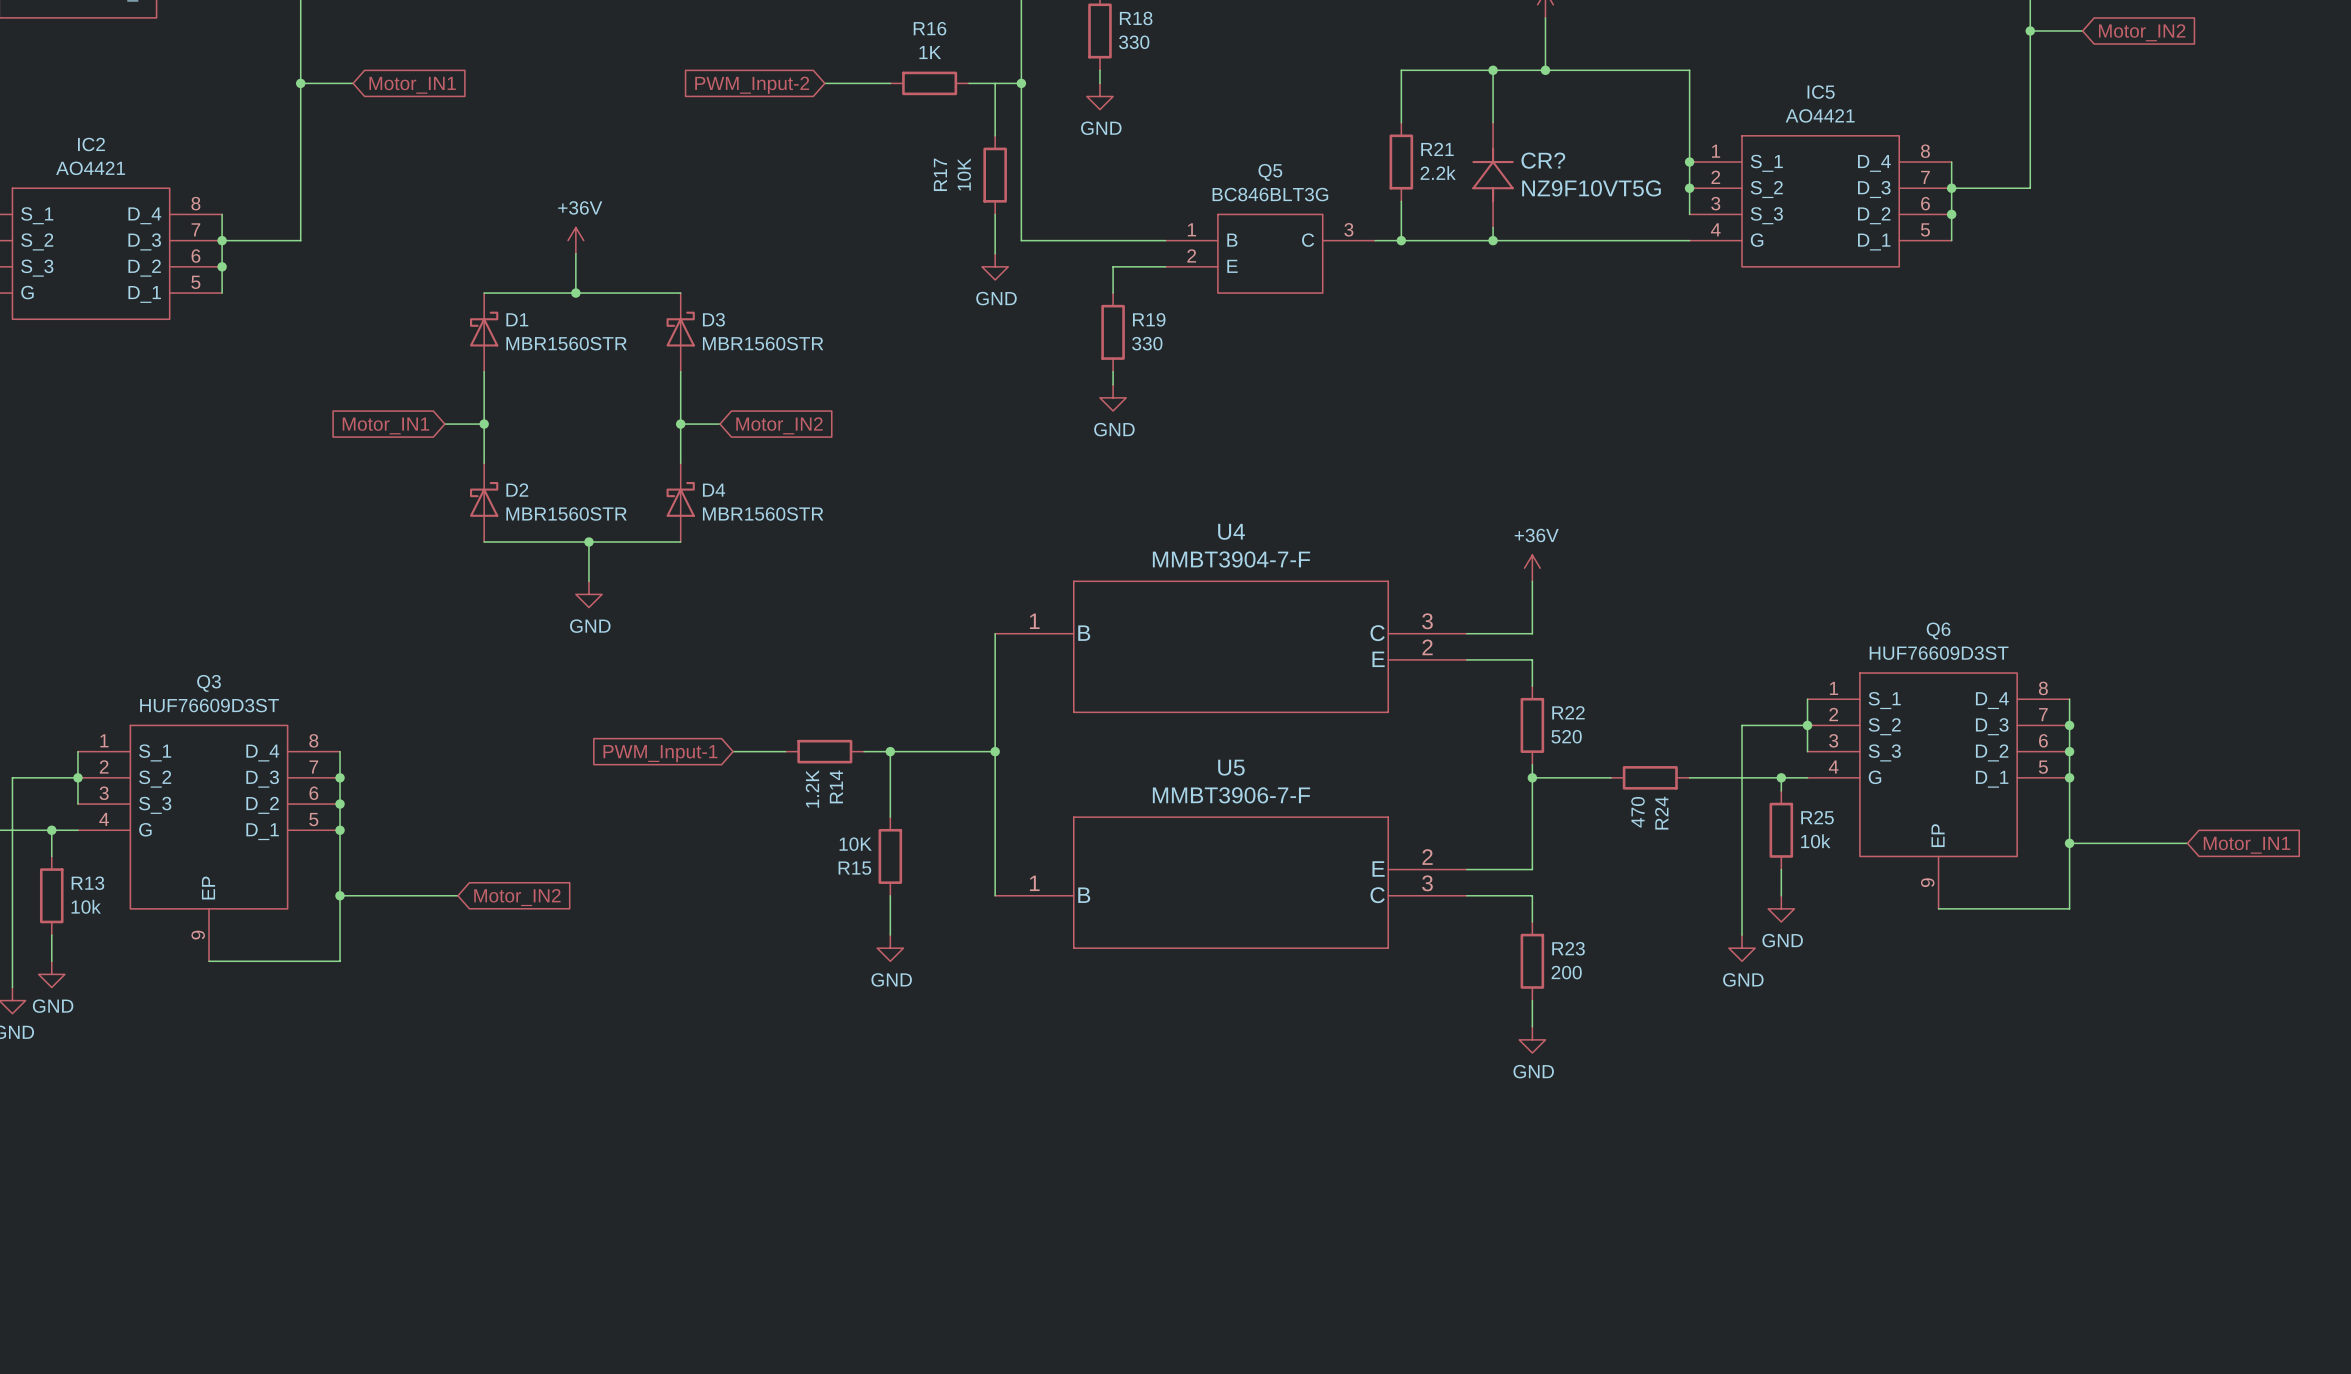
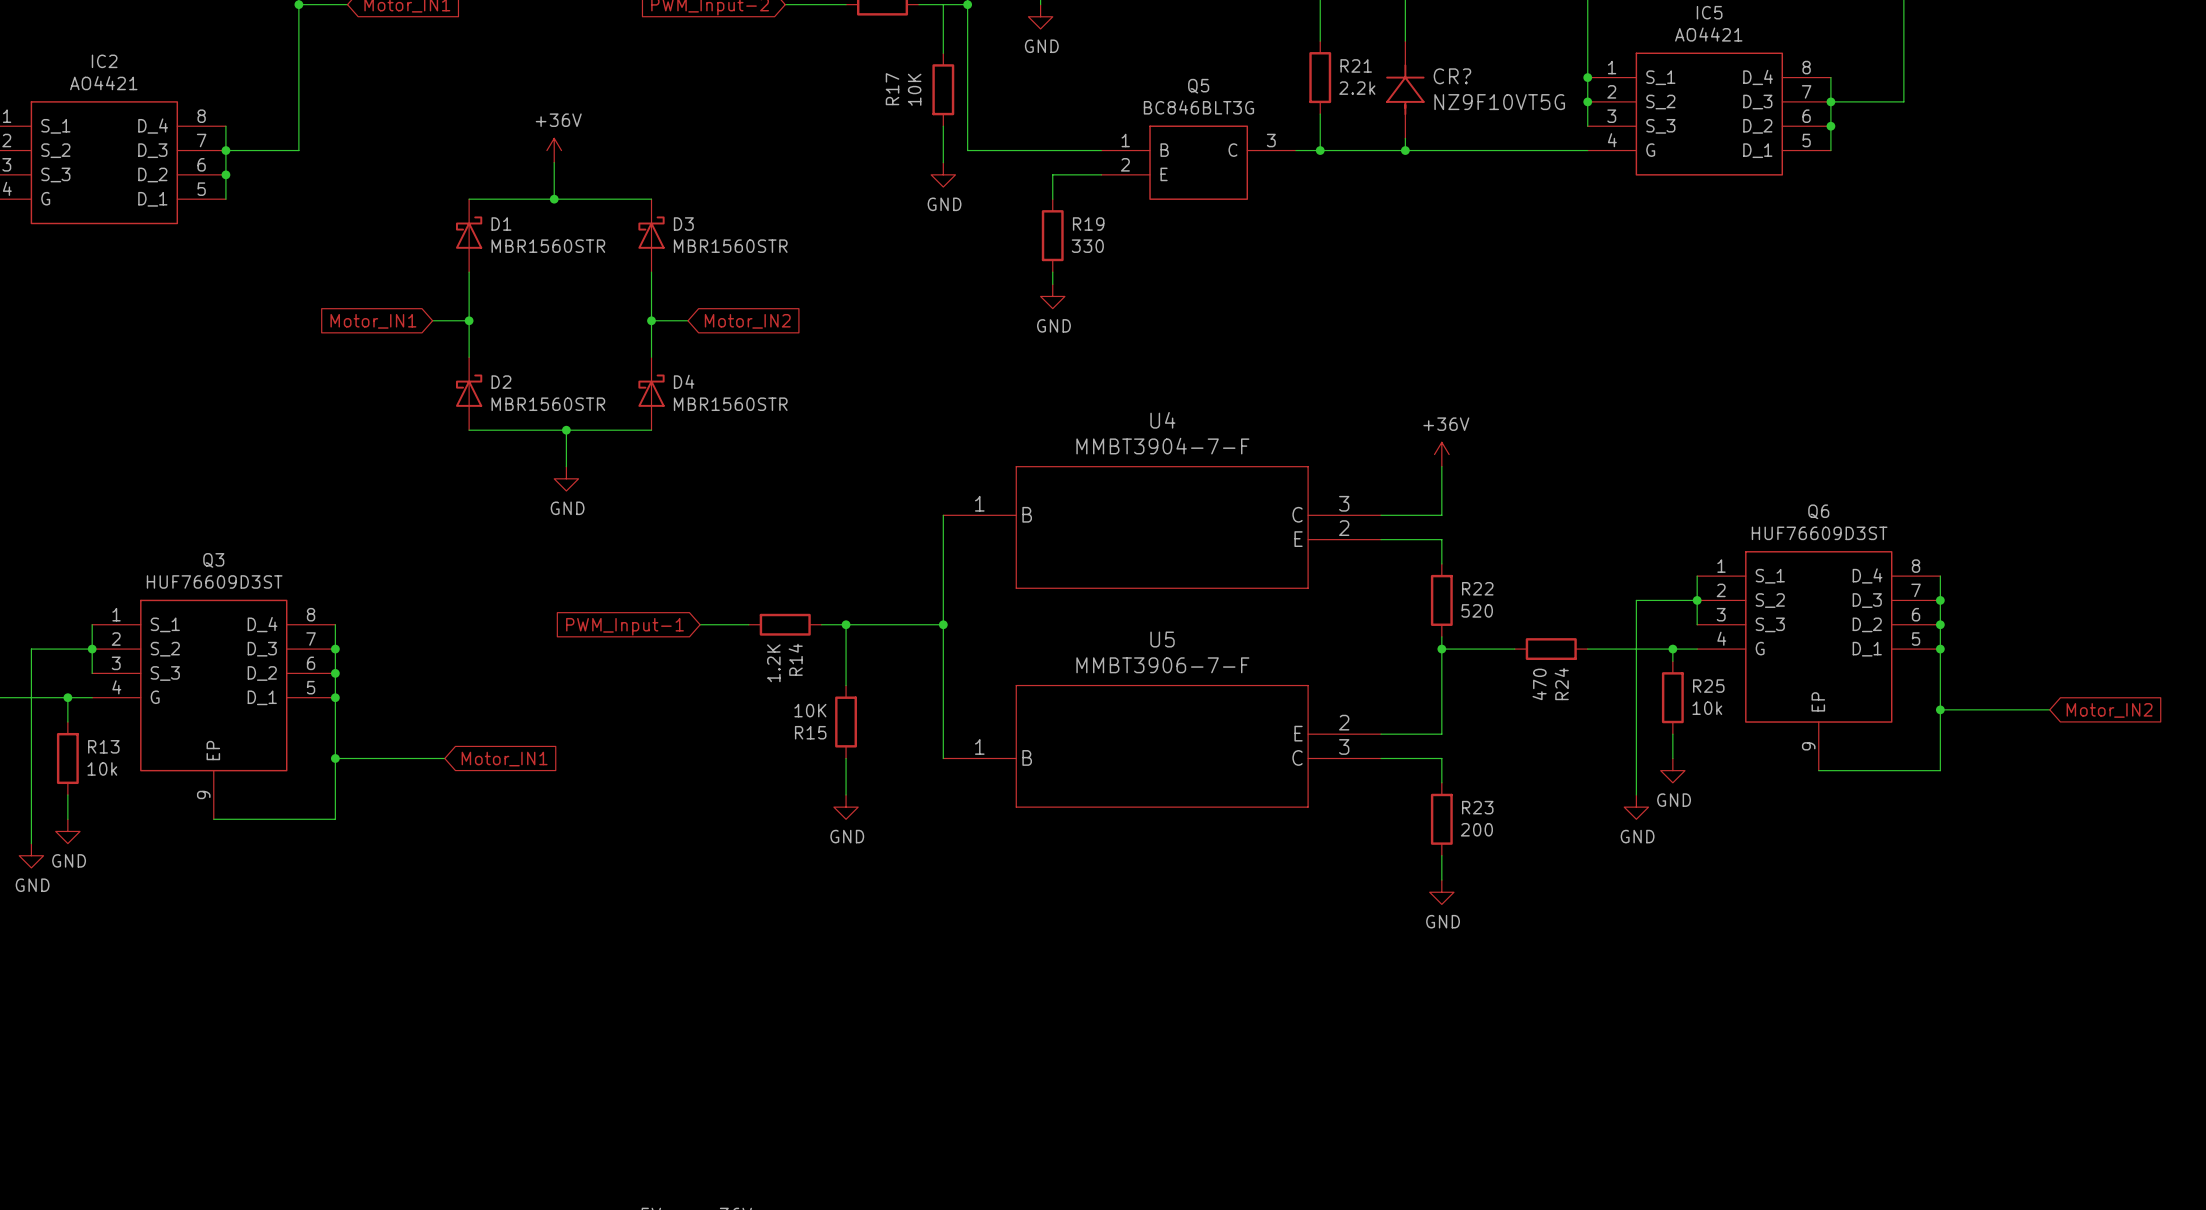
global label: Motor_IN1 (2247, 845) -> Motor_IN2 (2109, 710)
global label: Motor_IN2 (517, 897) -> Motor_IN1 (504, 759)

